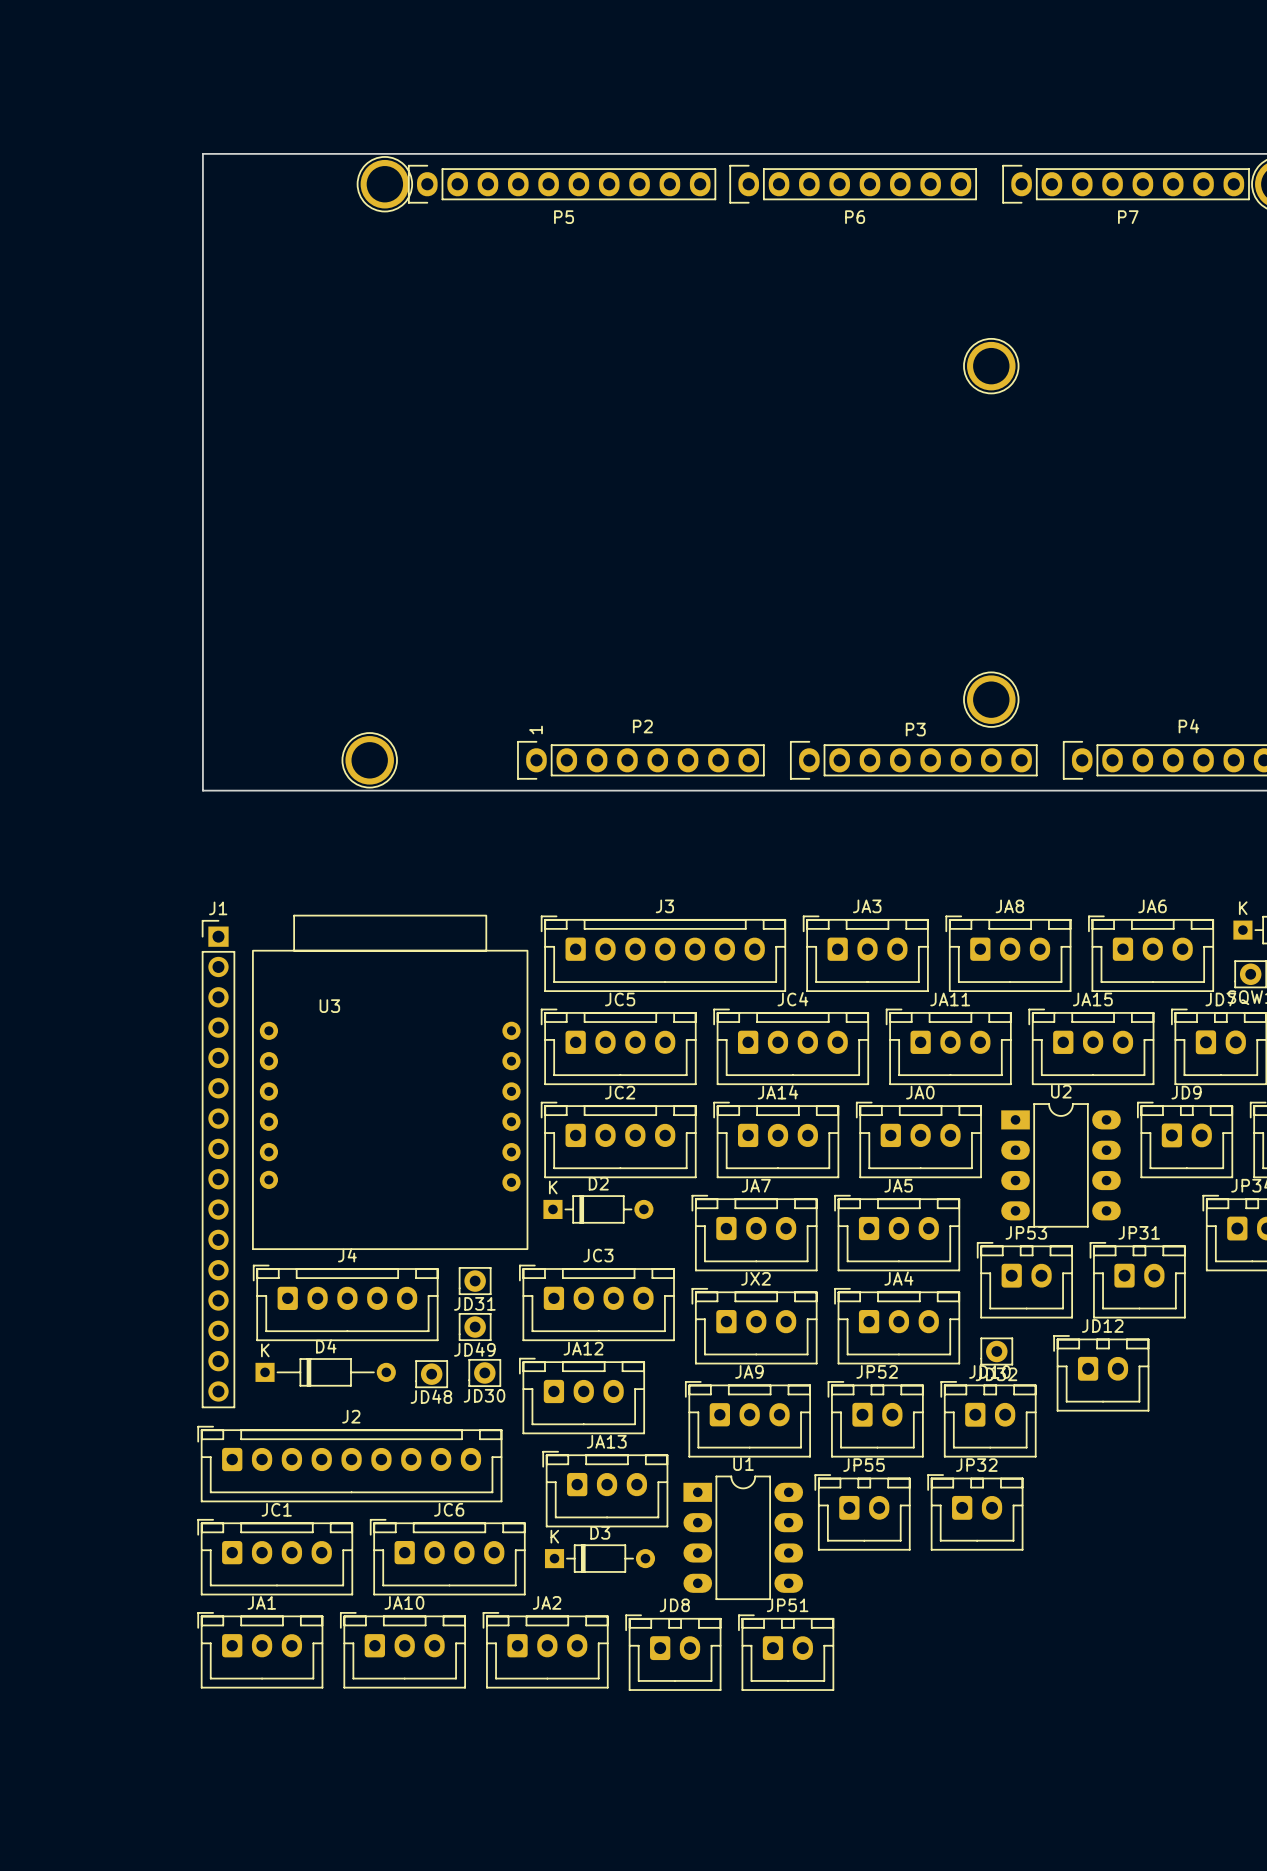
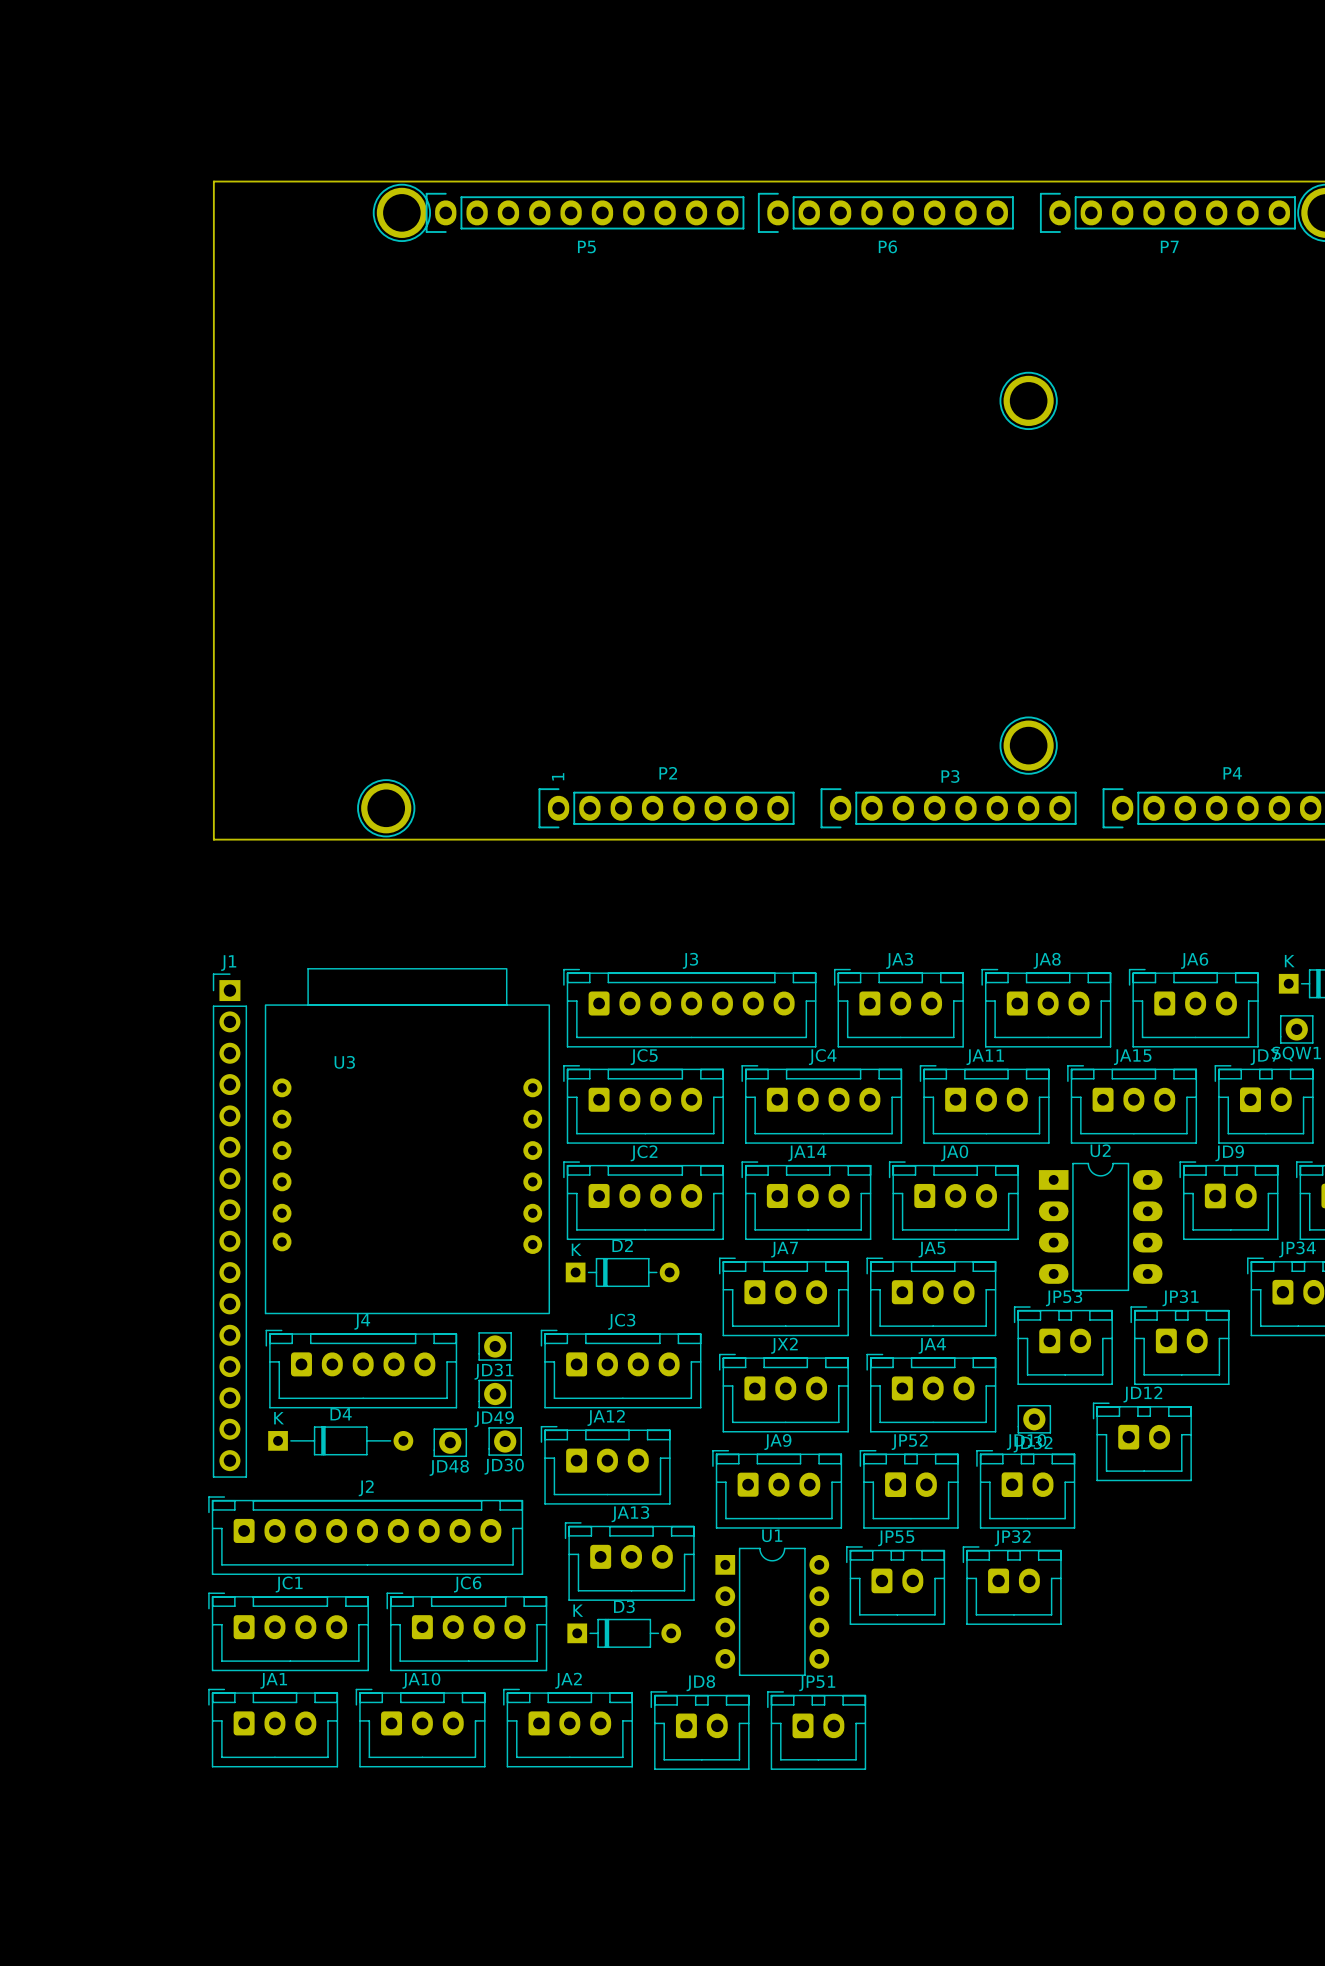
U1 footprint: [683, 1475, 804, 1600] -> [715, 1547, 830, 1677]

